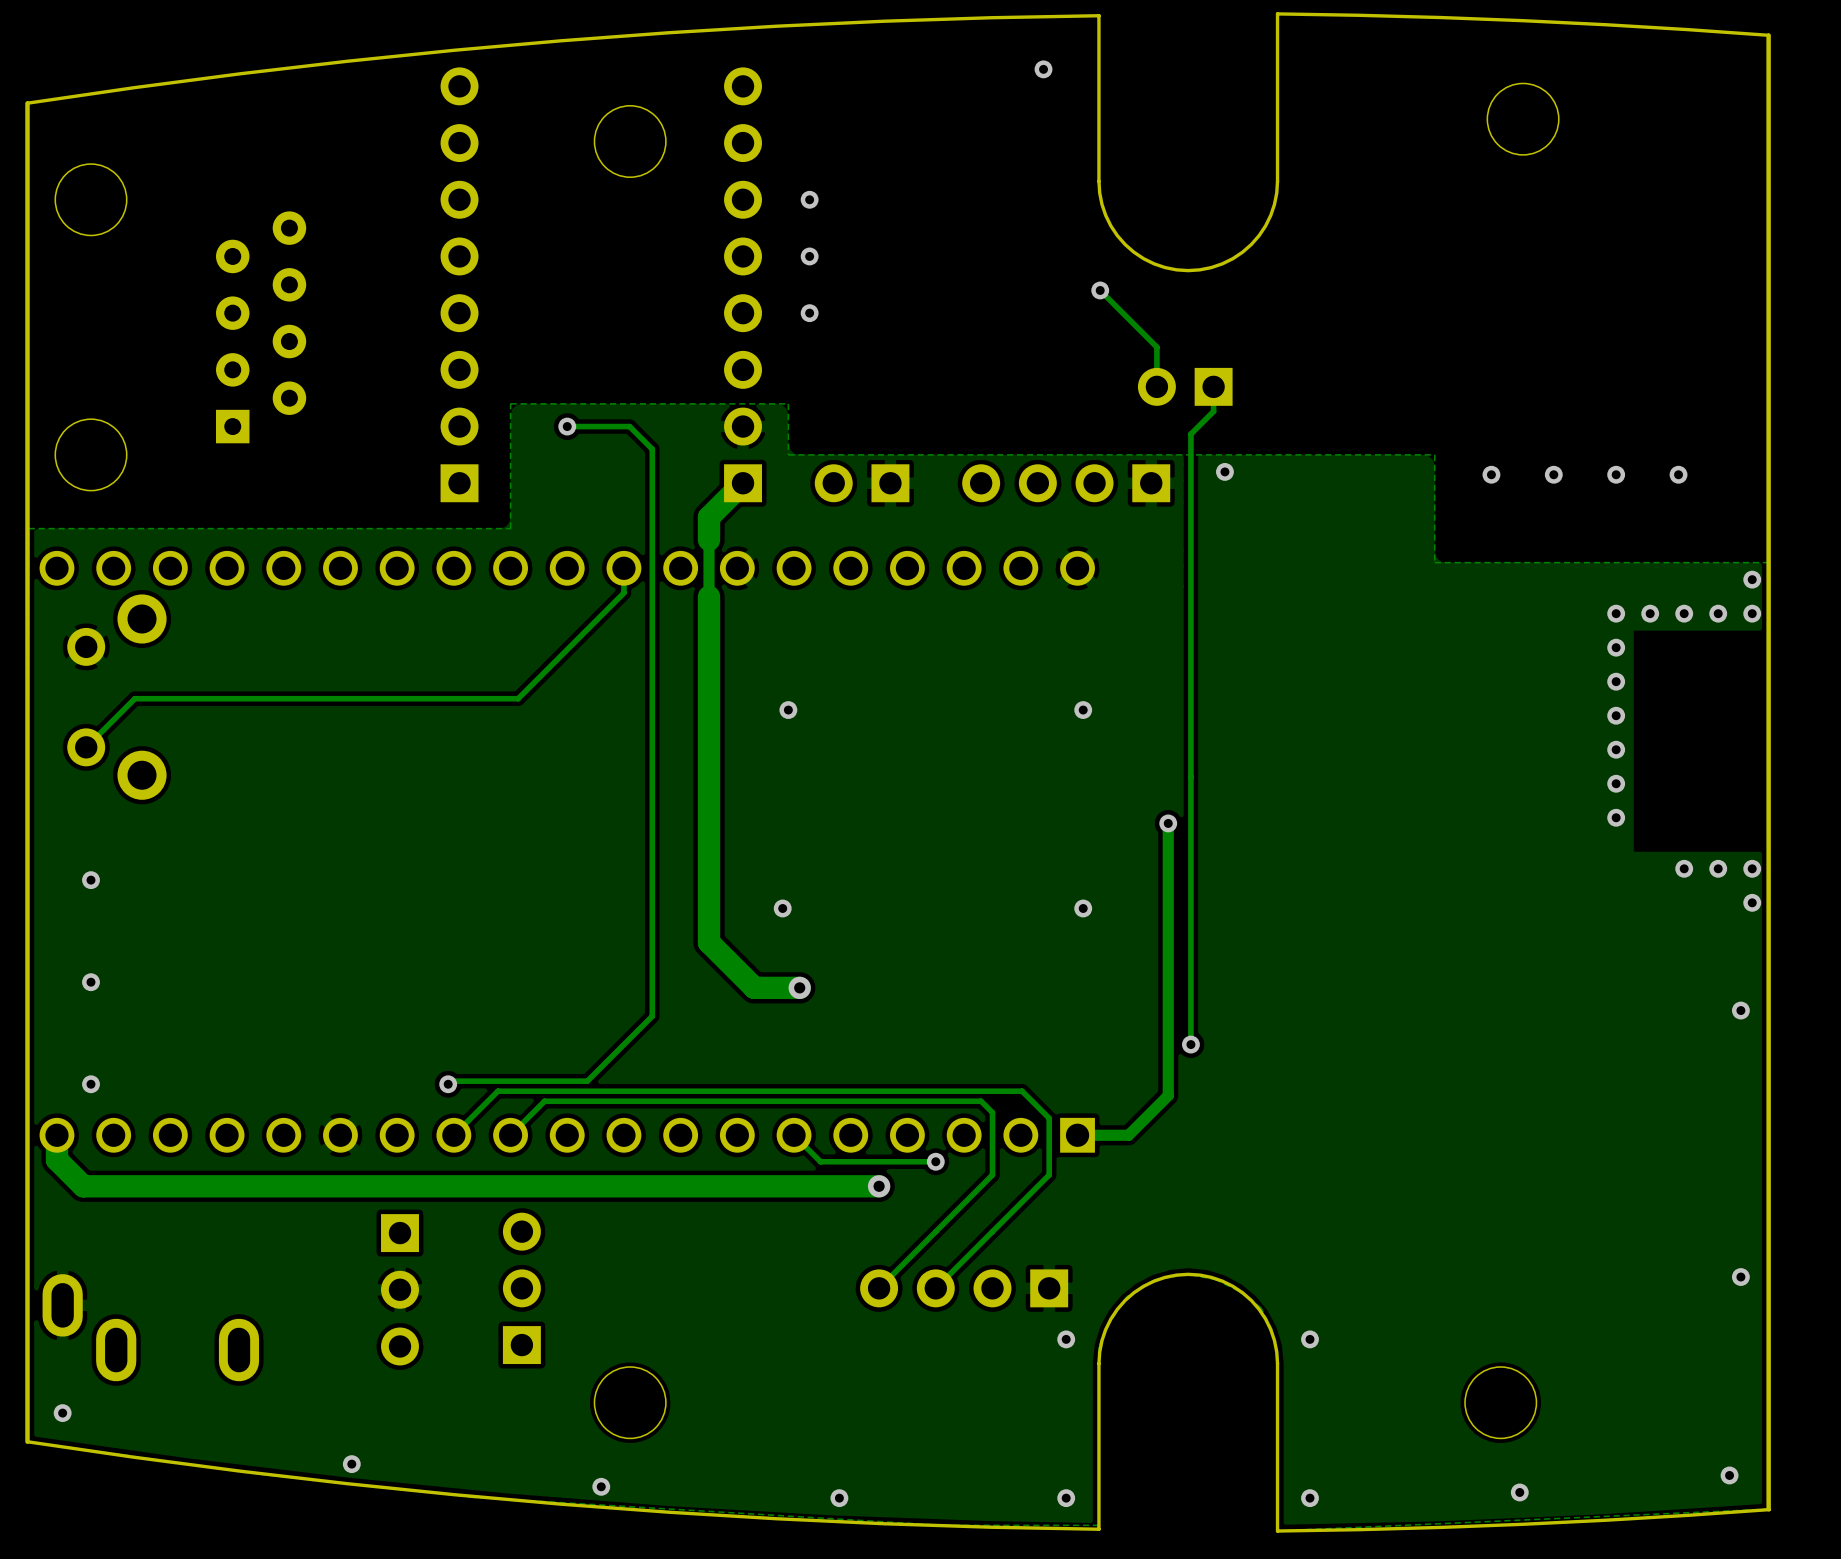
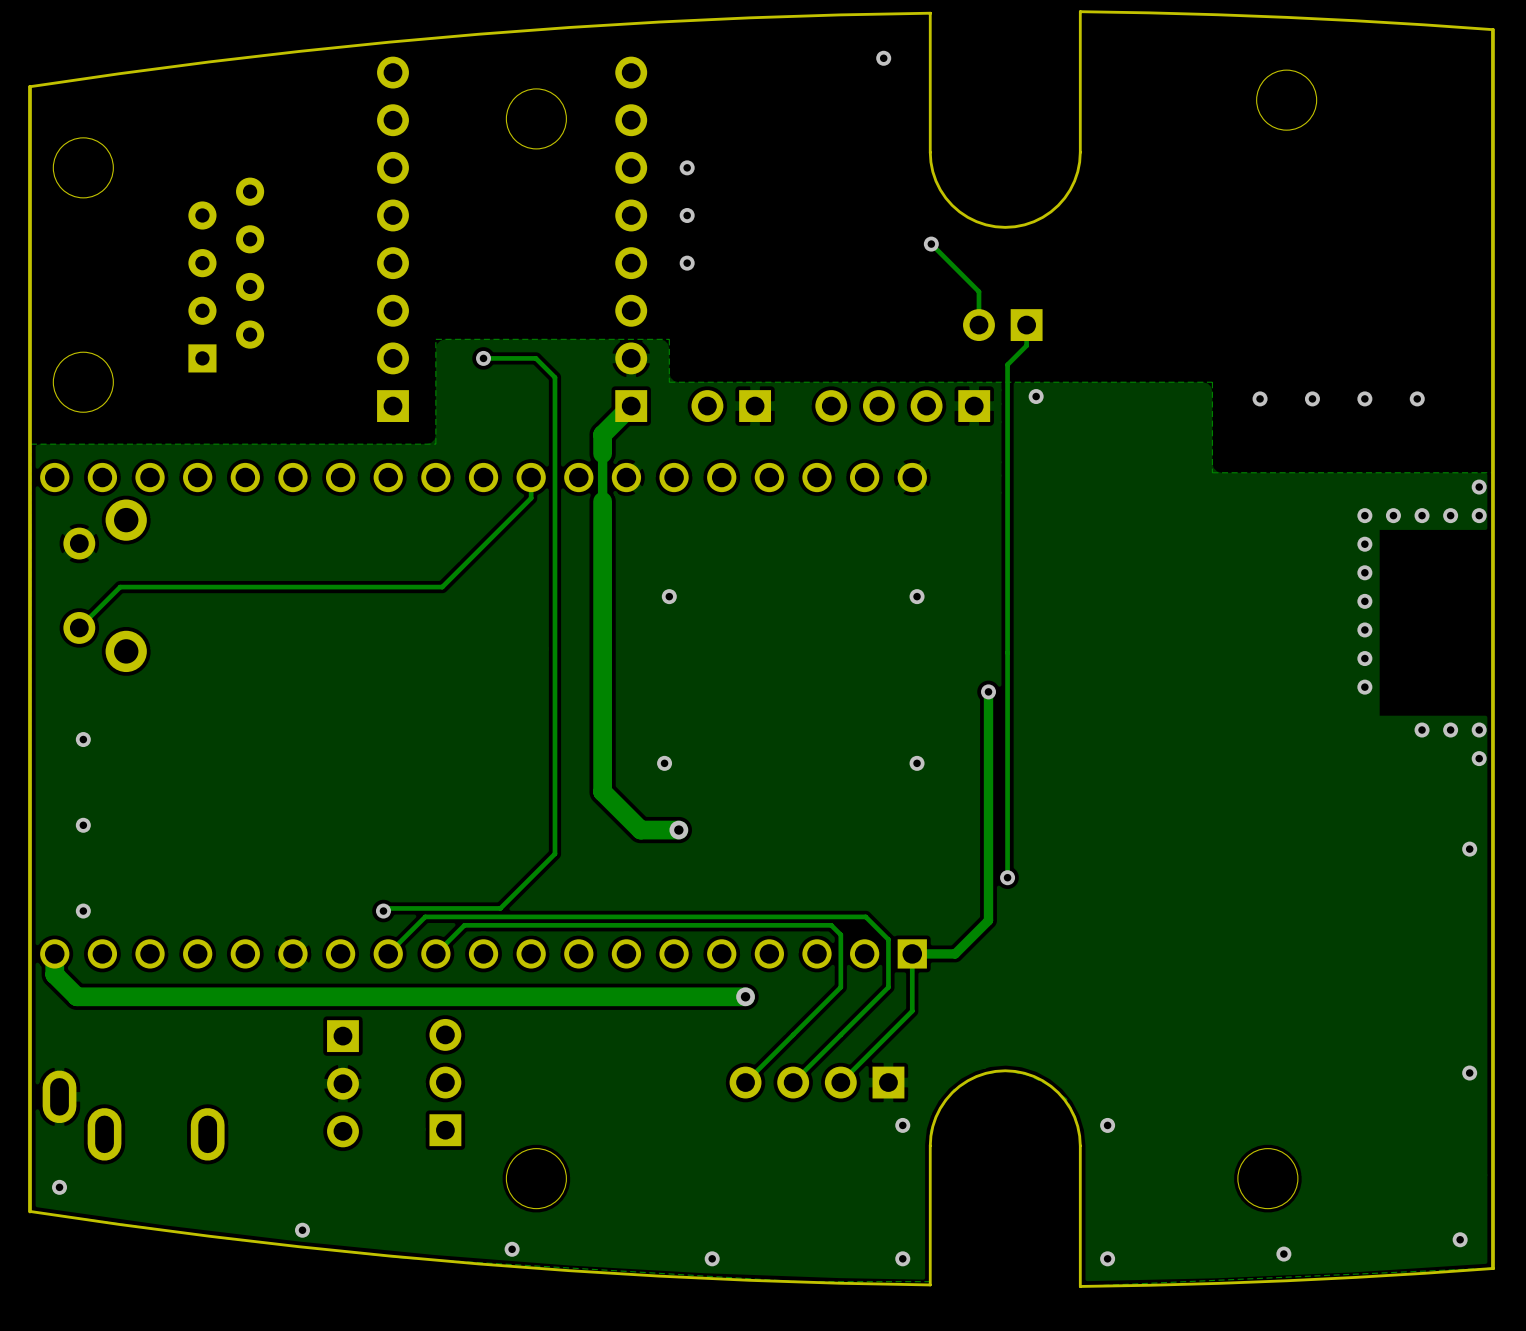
track: (794, 1135) (820, 1161) (935, 1161) (935, 1163) -> none
track: none -> (912, 953) (912, 1011) (840, 1082)
via: (935, 1161) -> none

